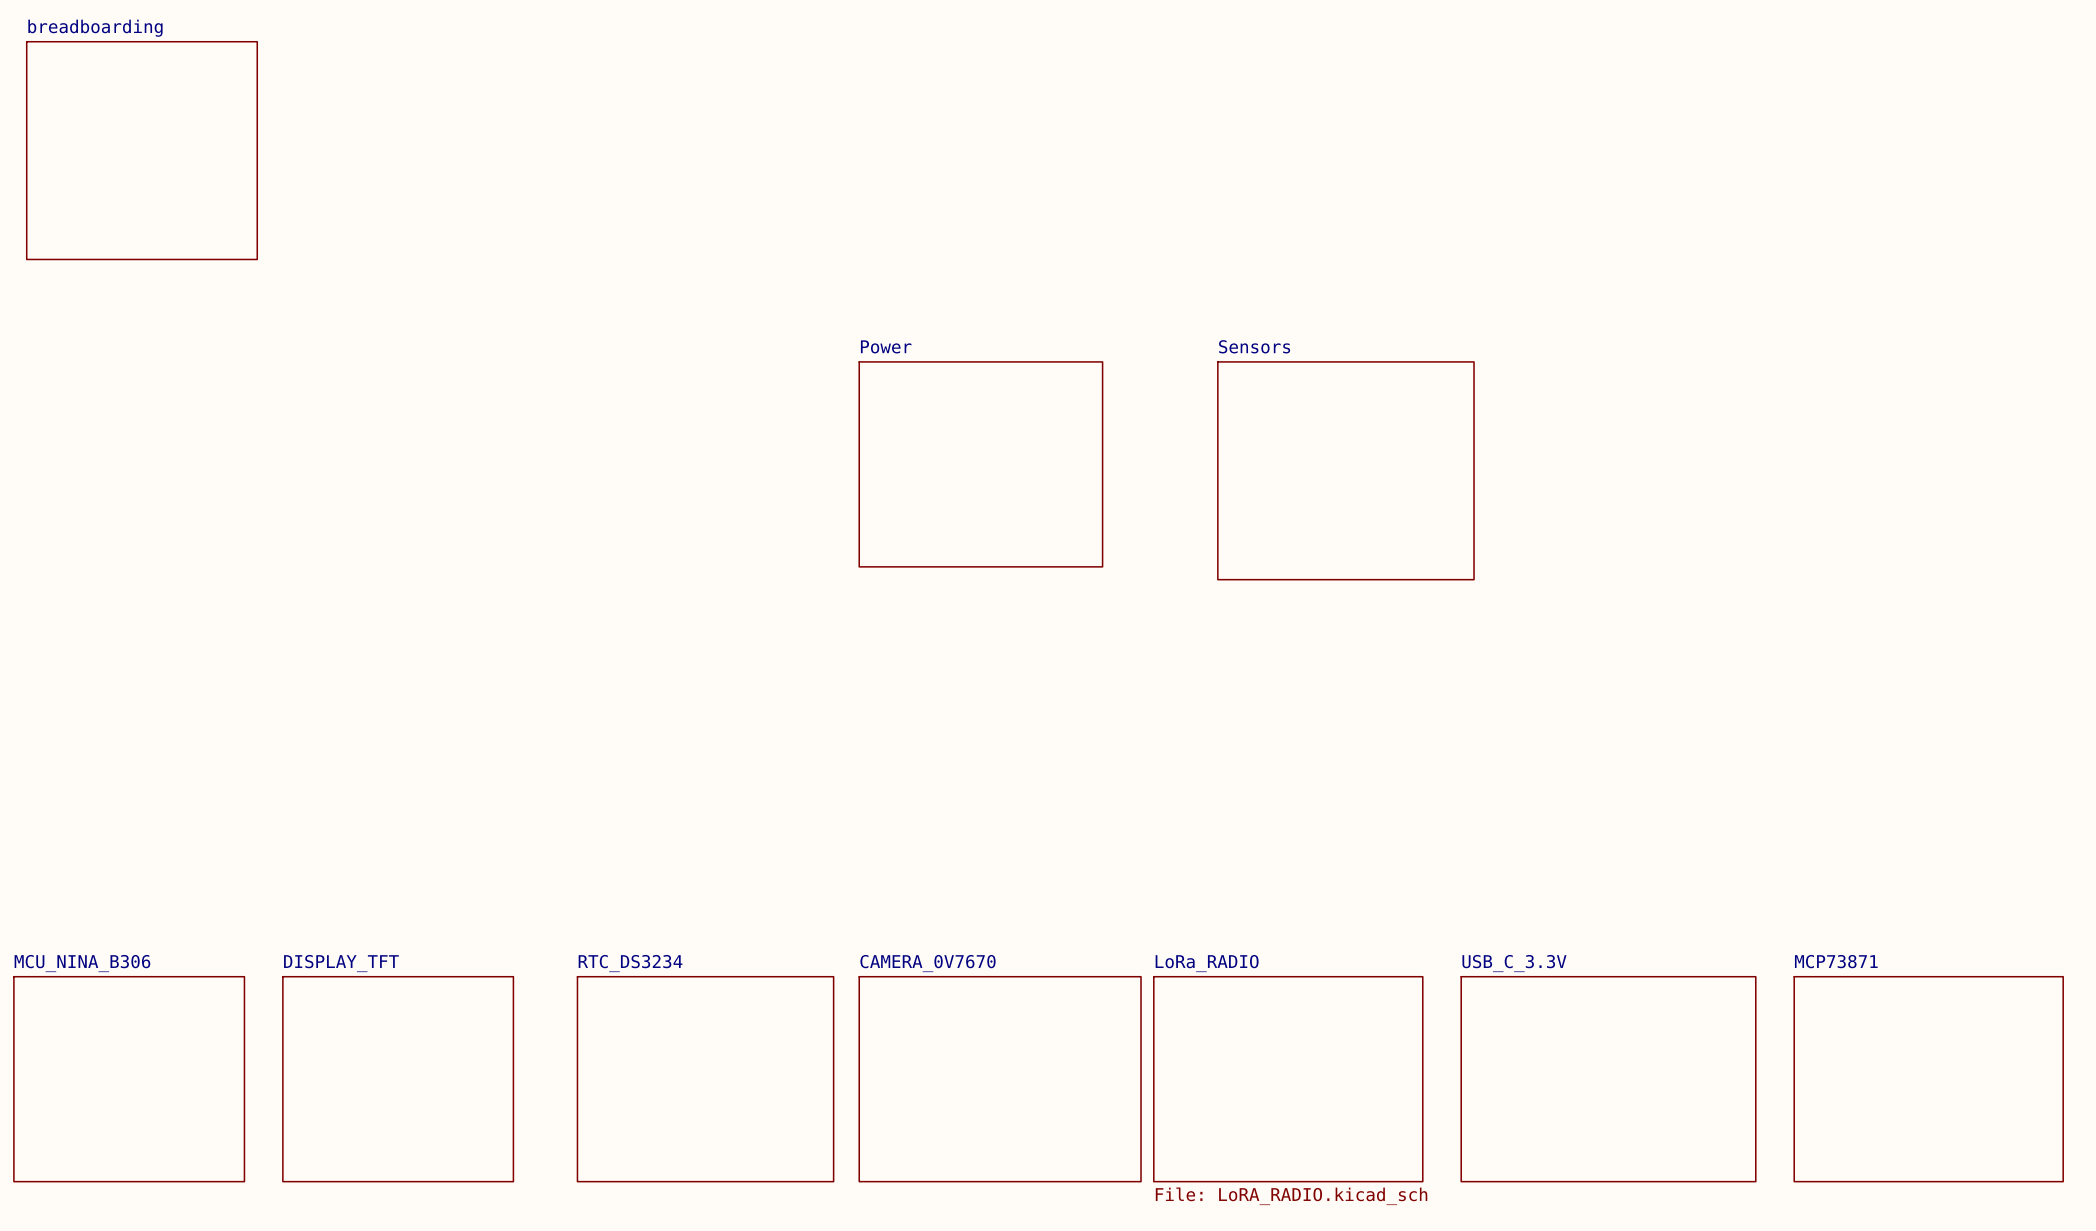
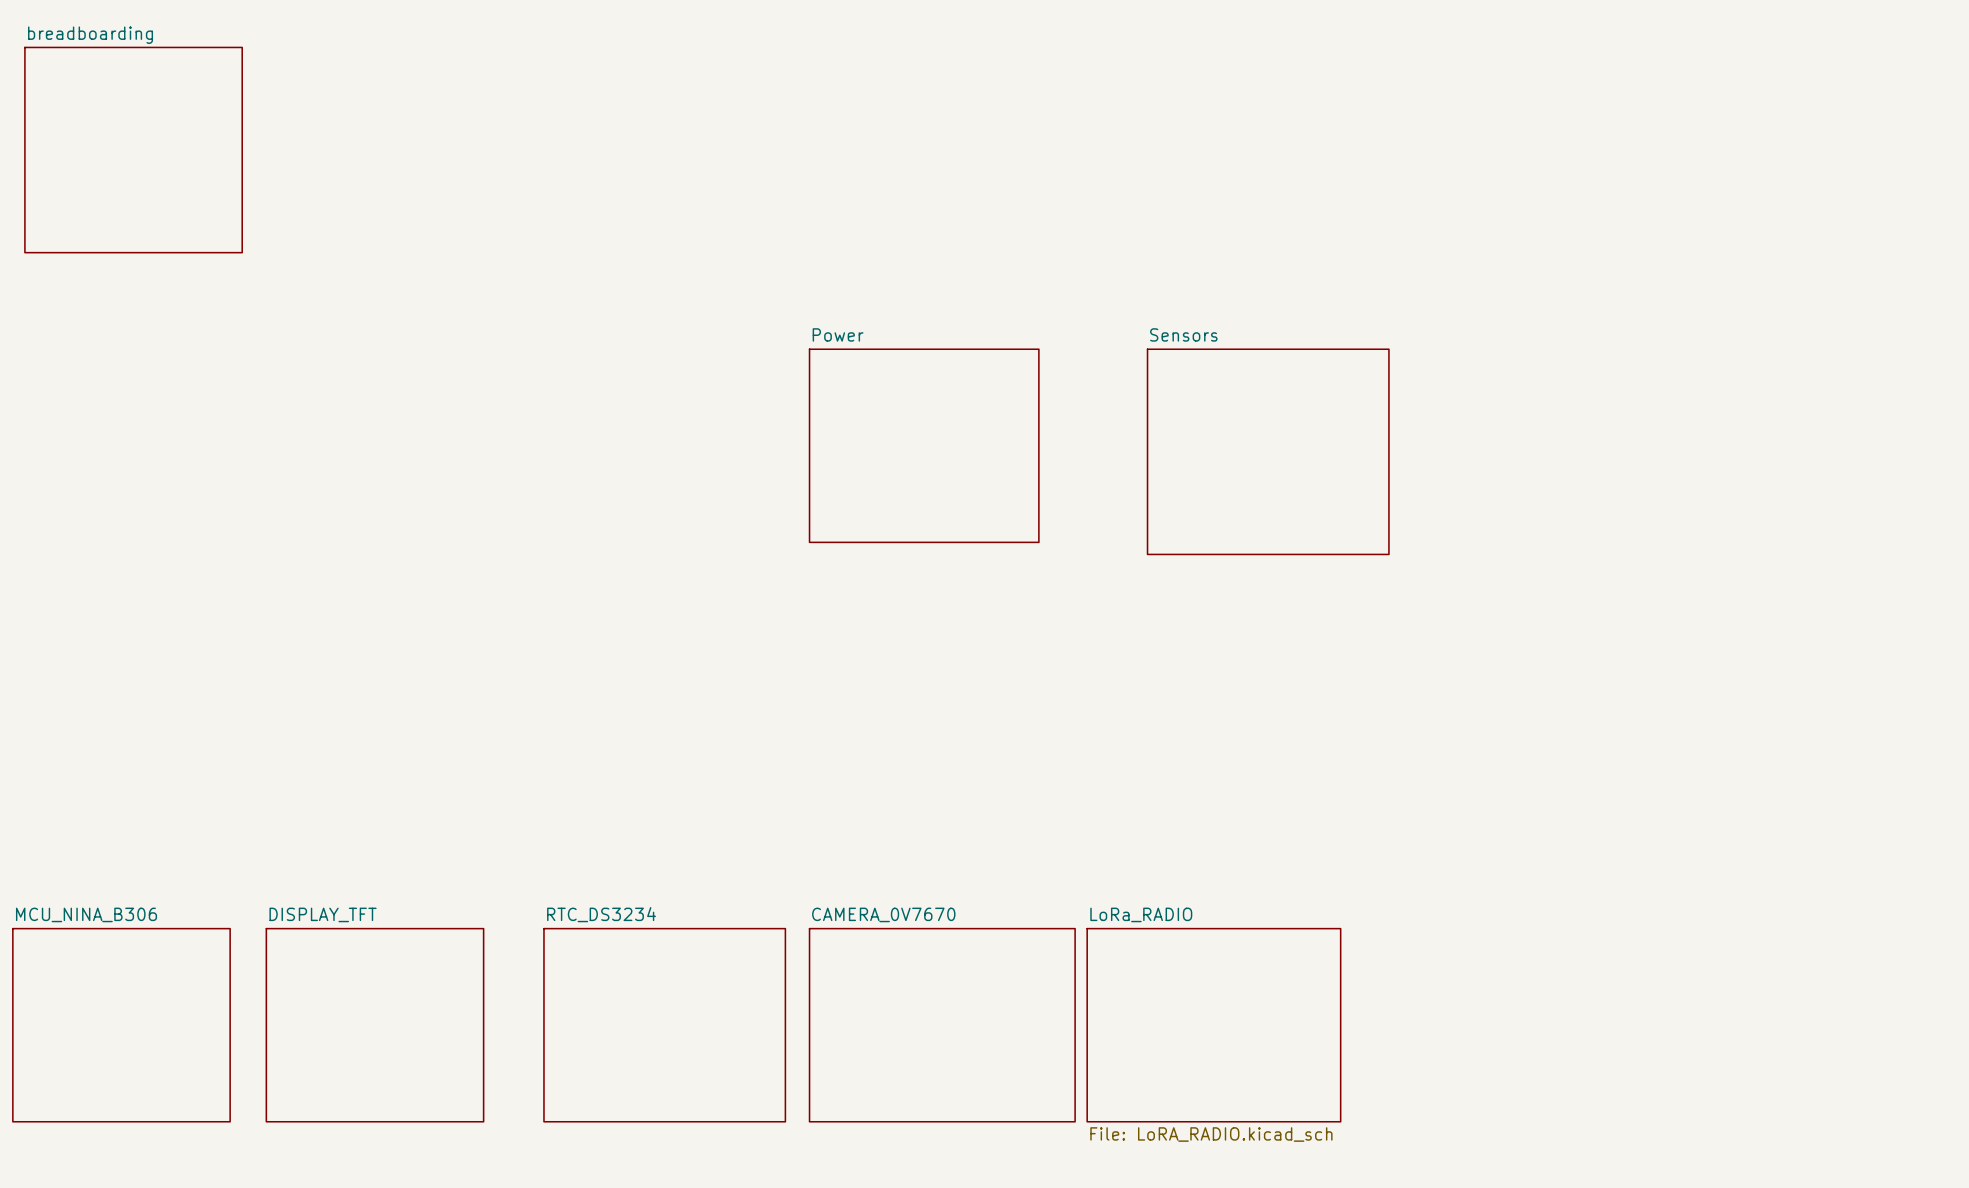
sheet USB_C_3.3V: (1608, 1079) -> none
sheet MCP73871: (1928, 1079) -> none

